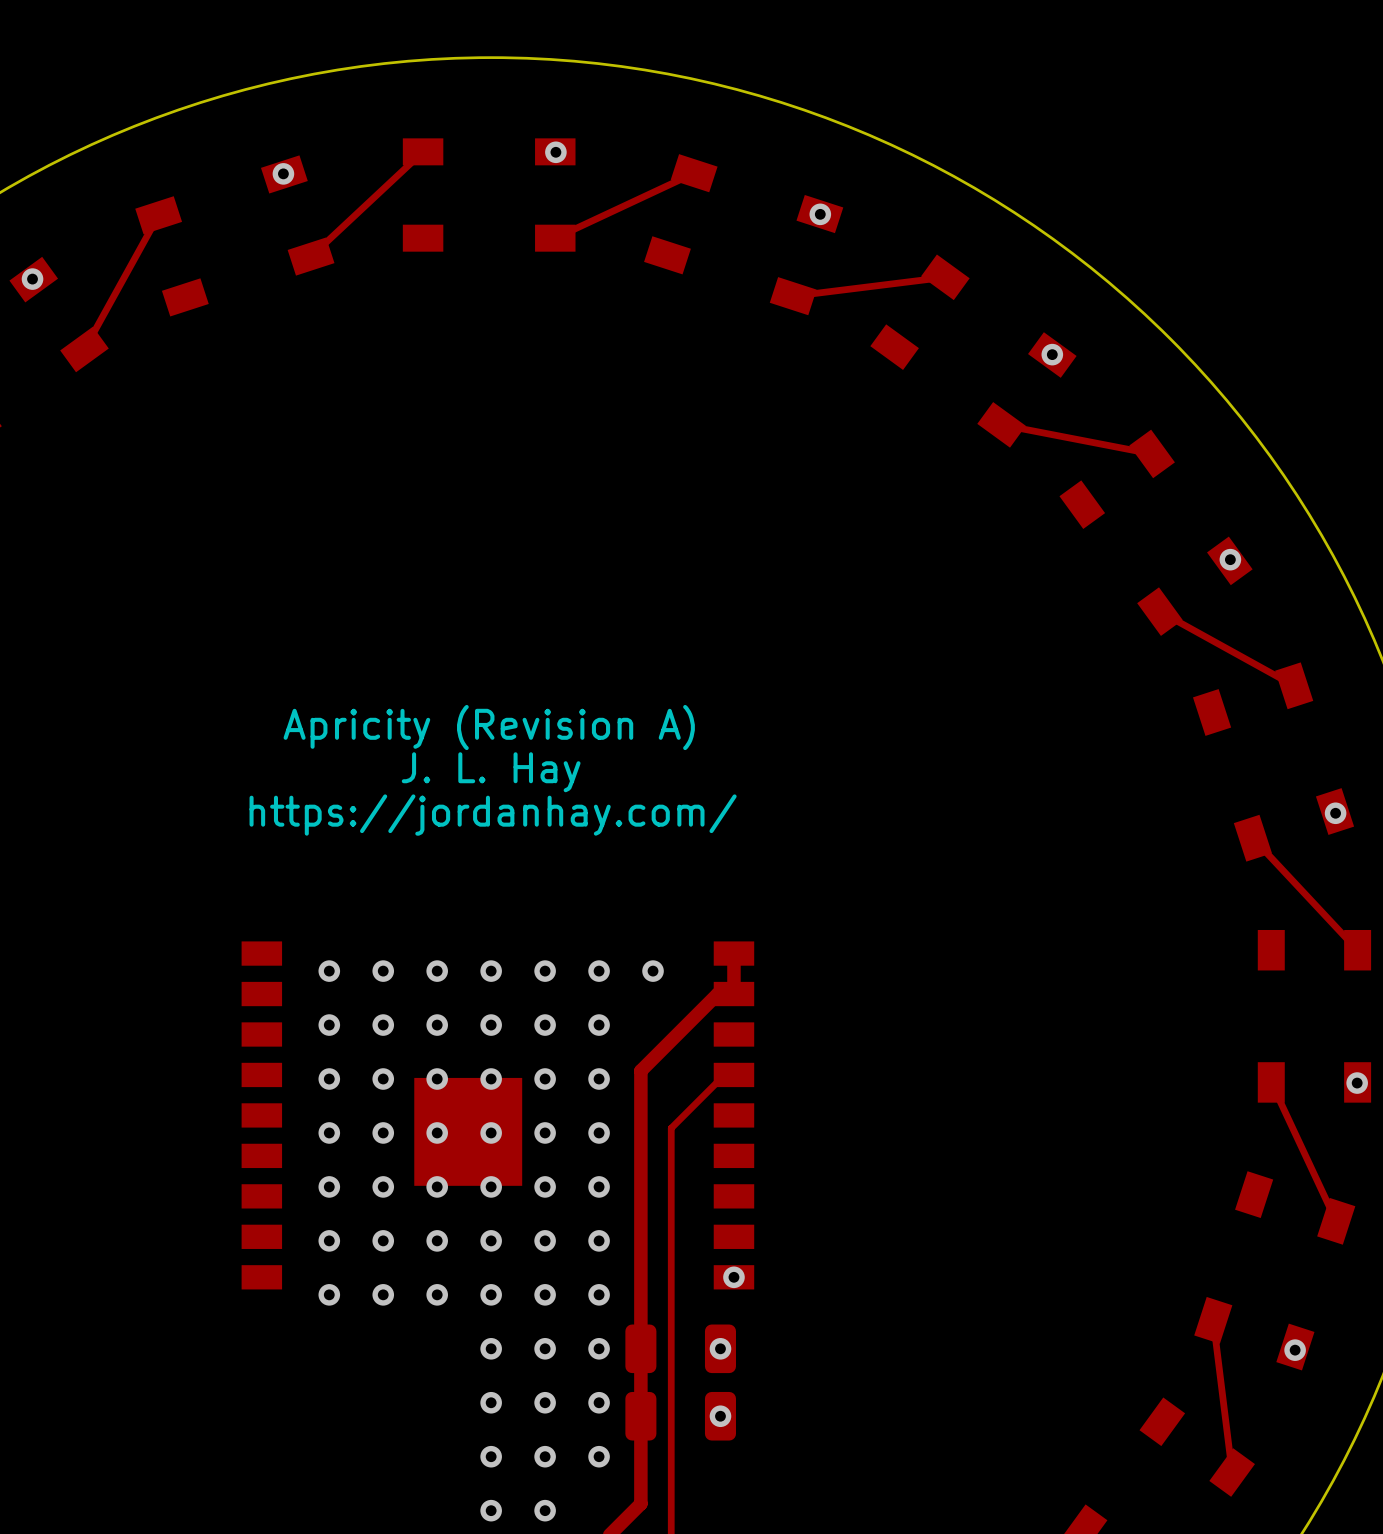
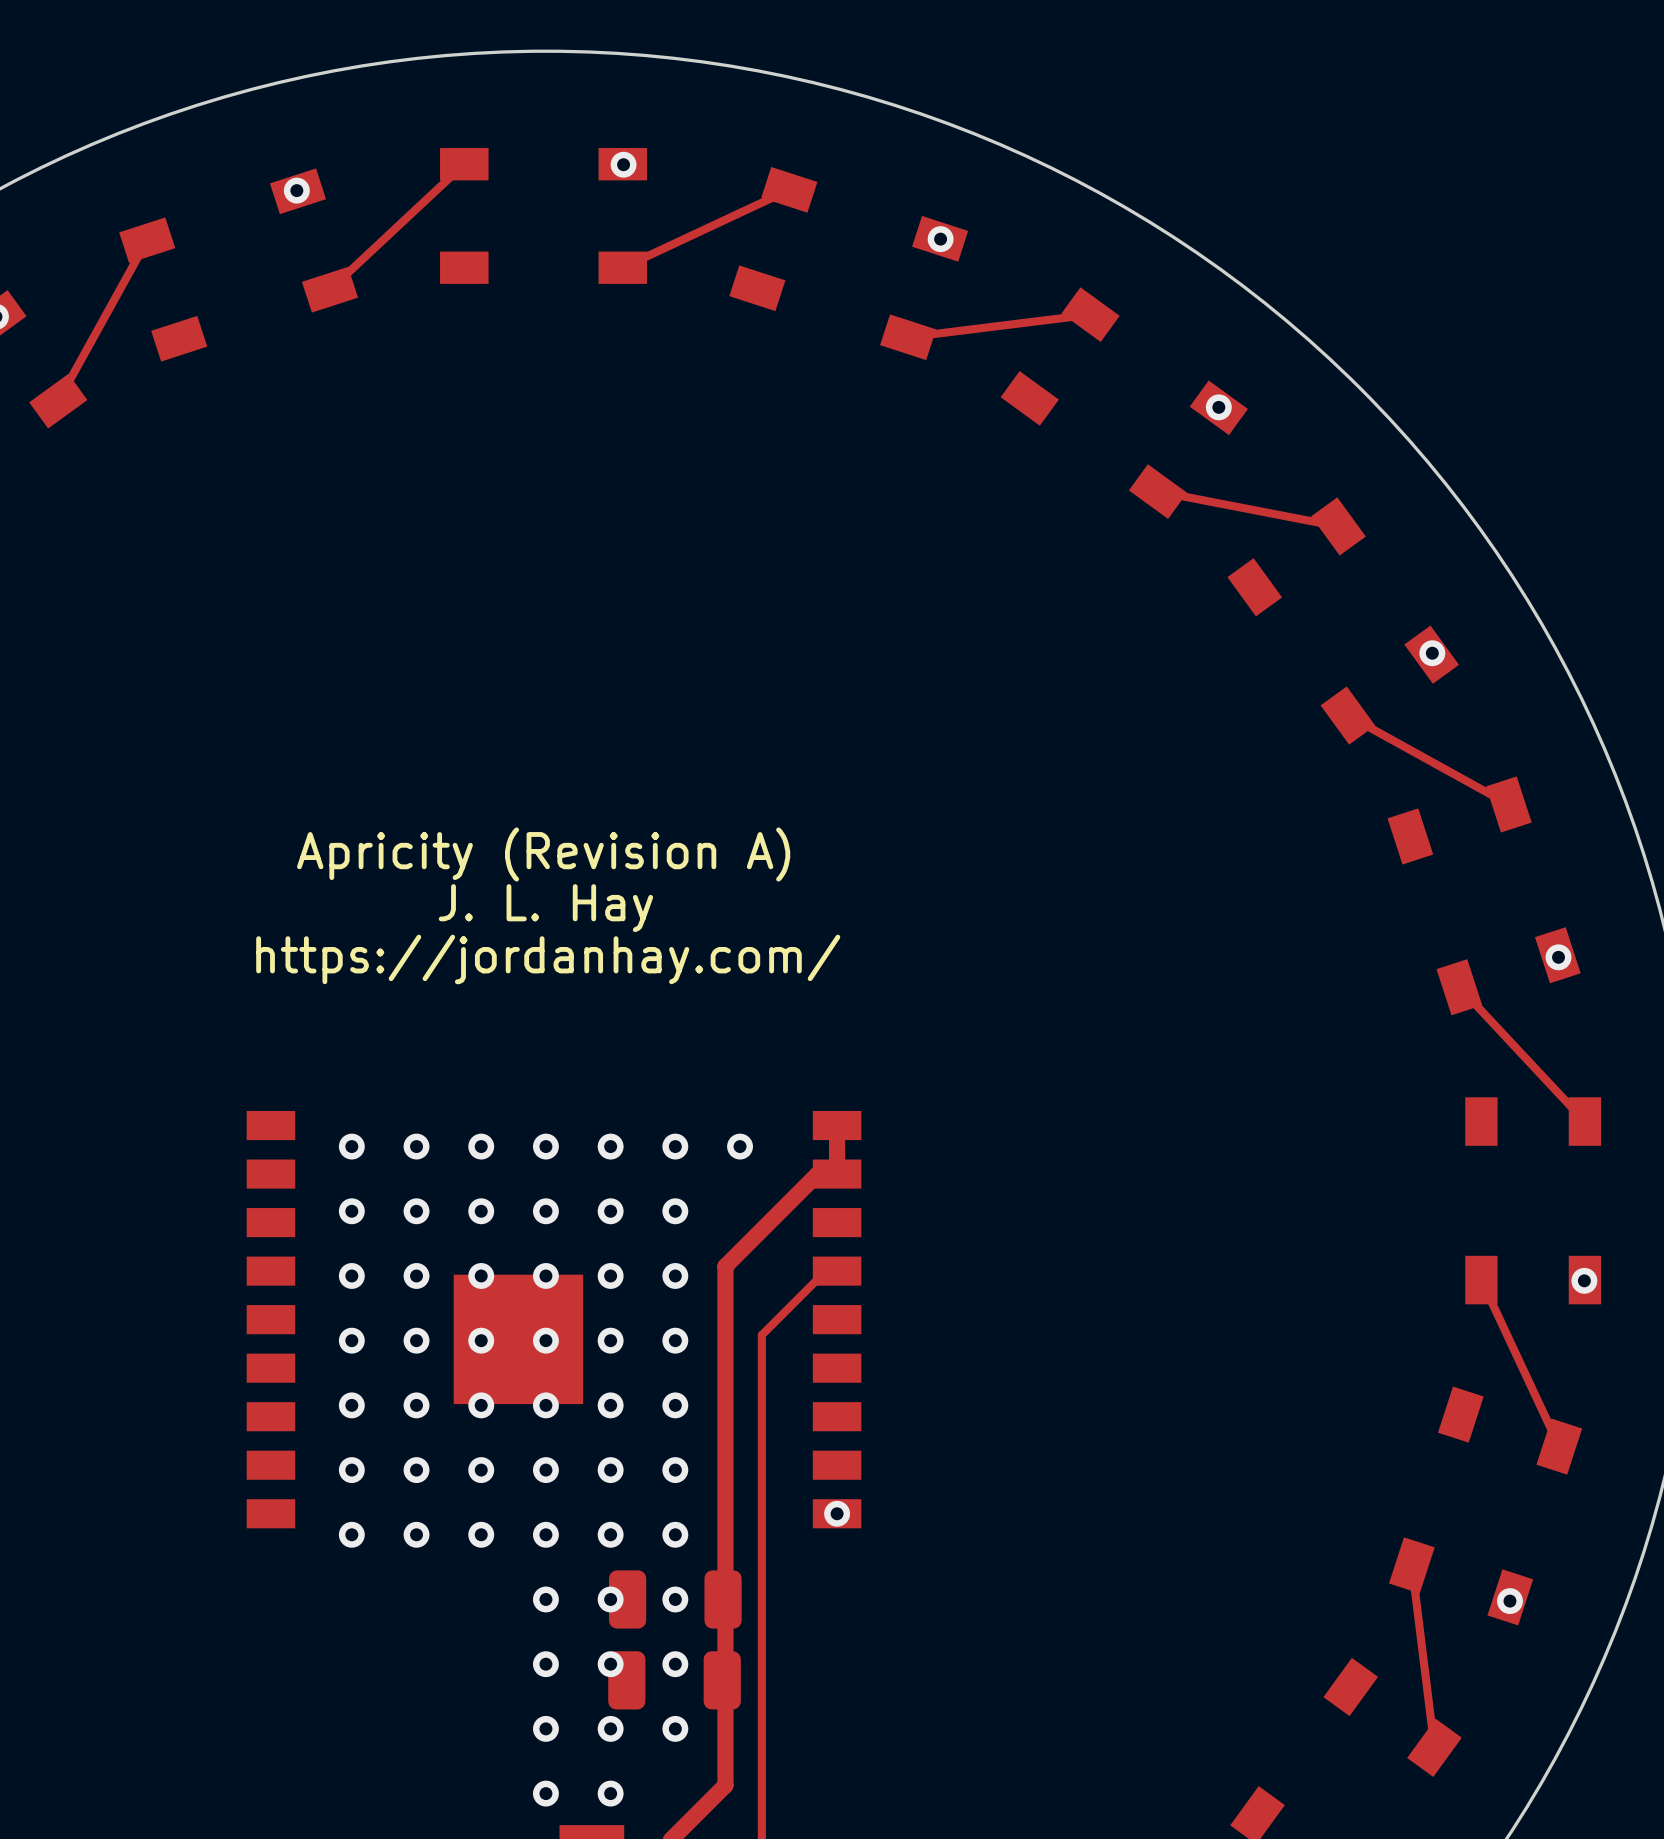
part: none -> (675, 1599)
part: (680, 1348) -> none
via: (720, 1348) -> none
part: none -> (674, 1680)
part: (680, 1416) -> none
via: (720, 1416) -> none

